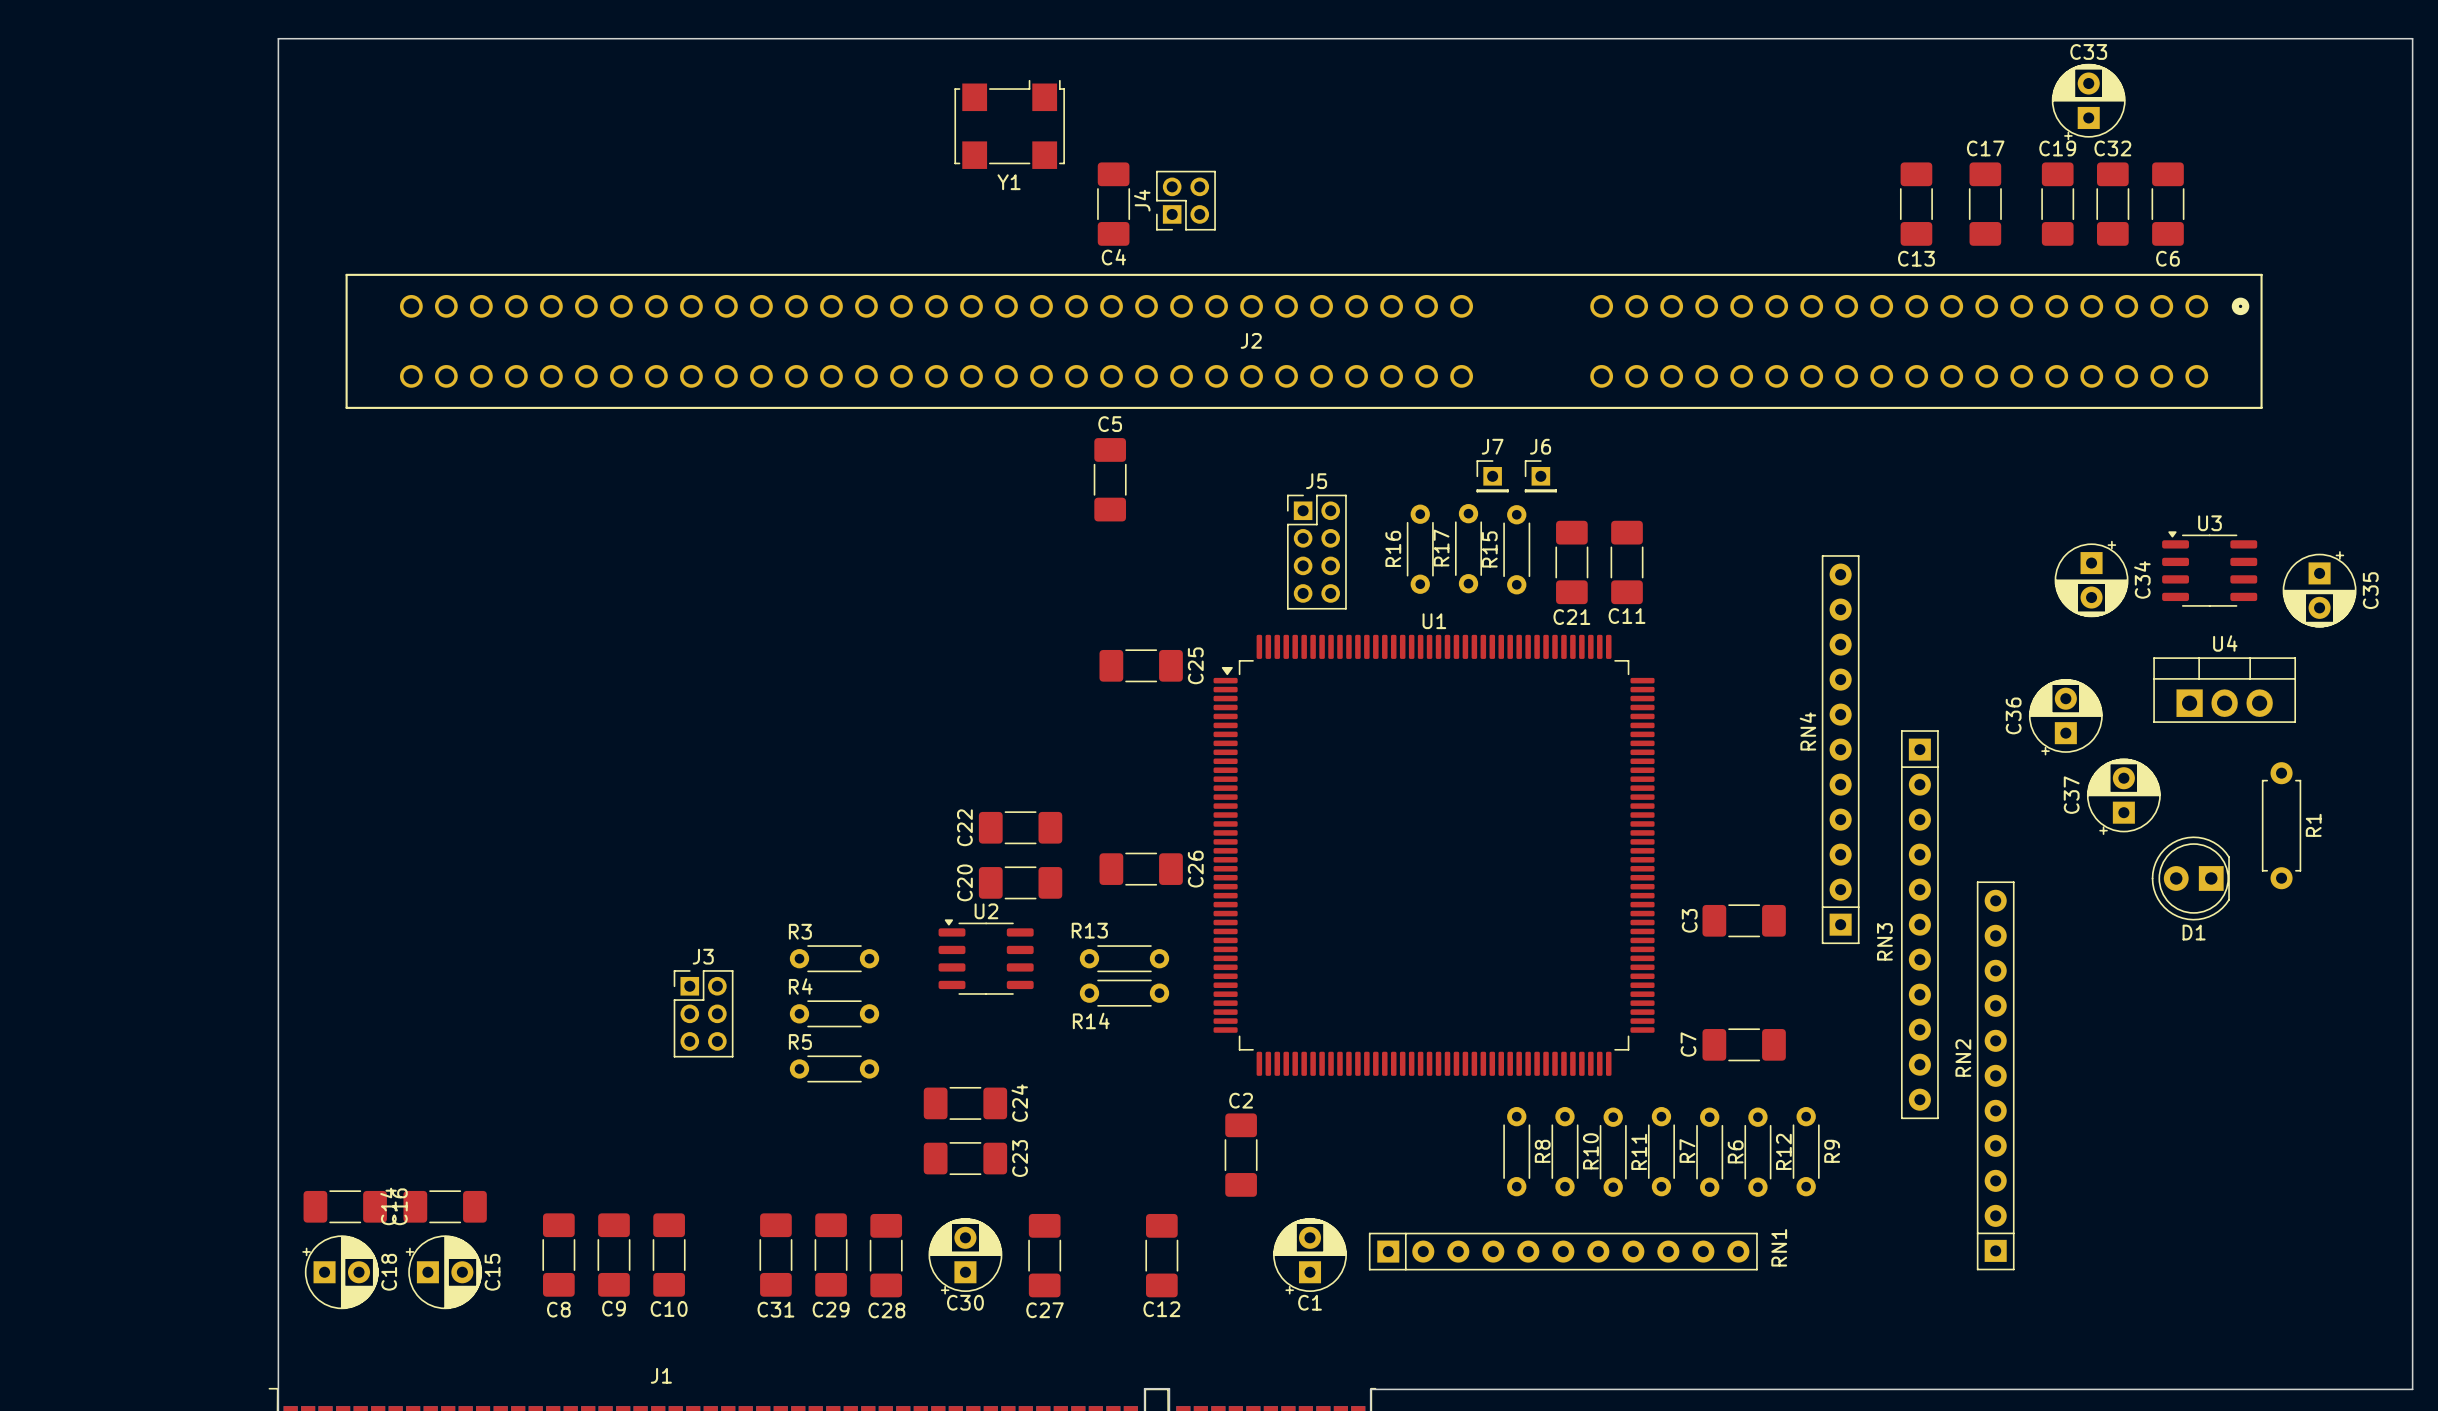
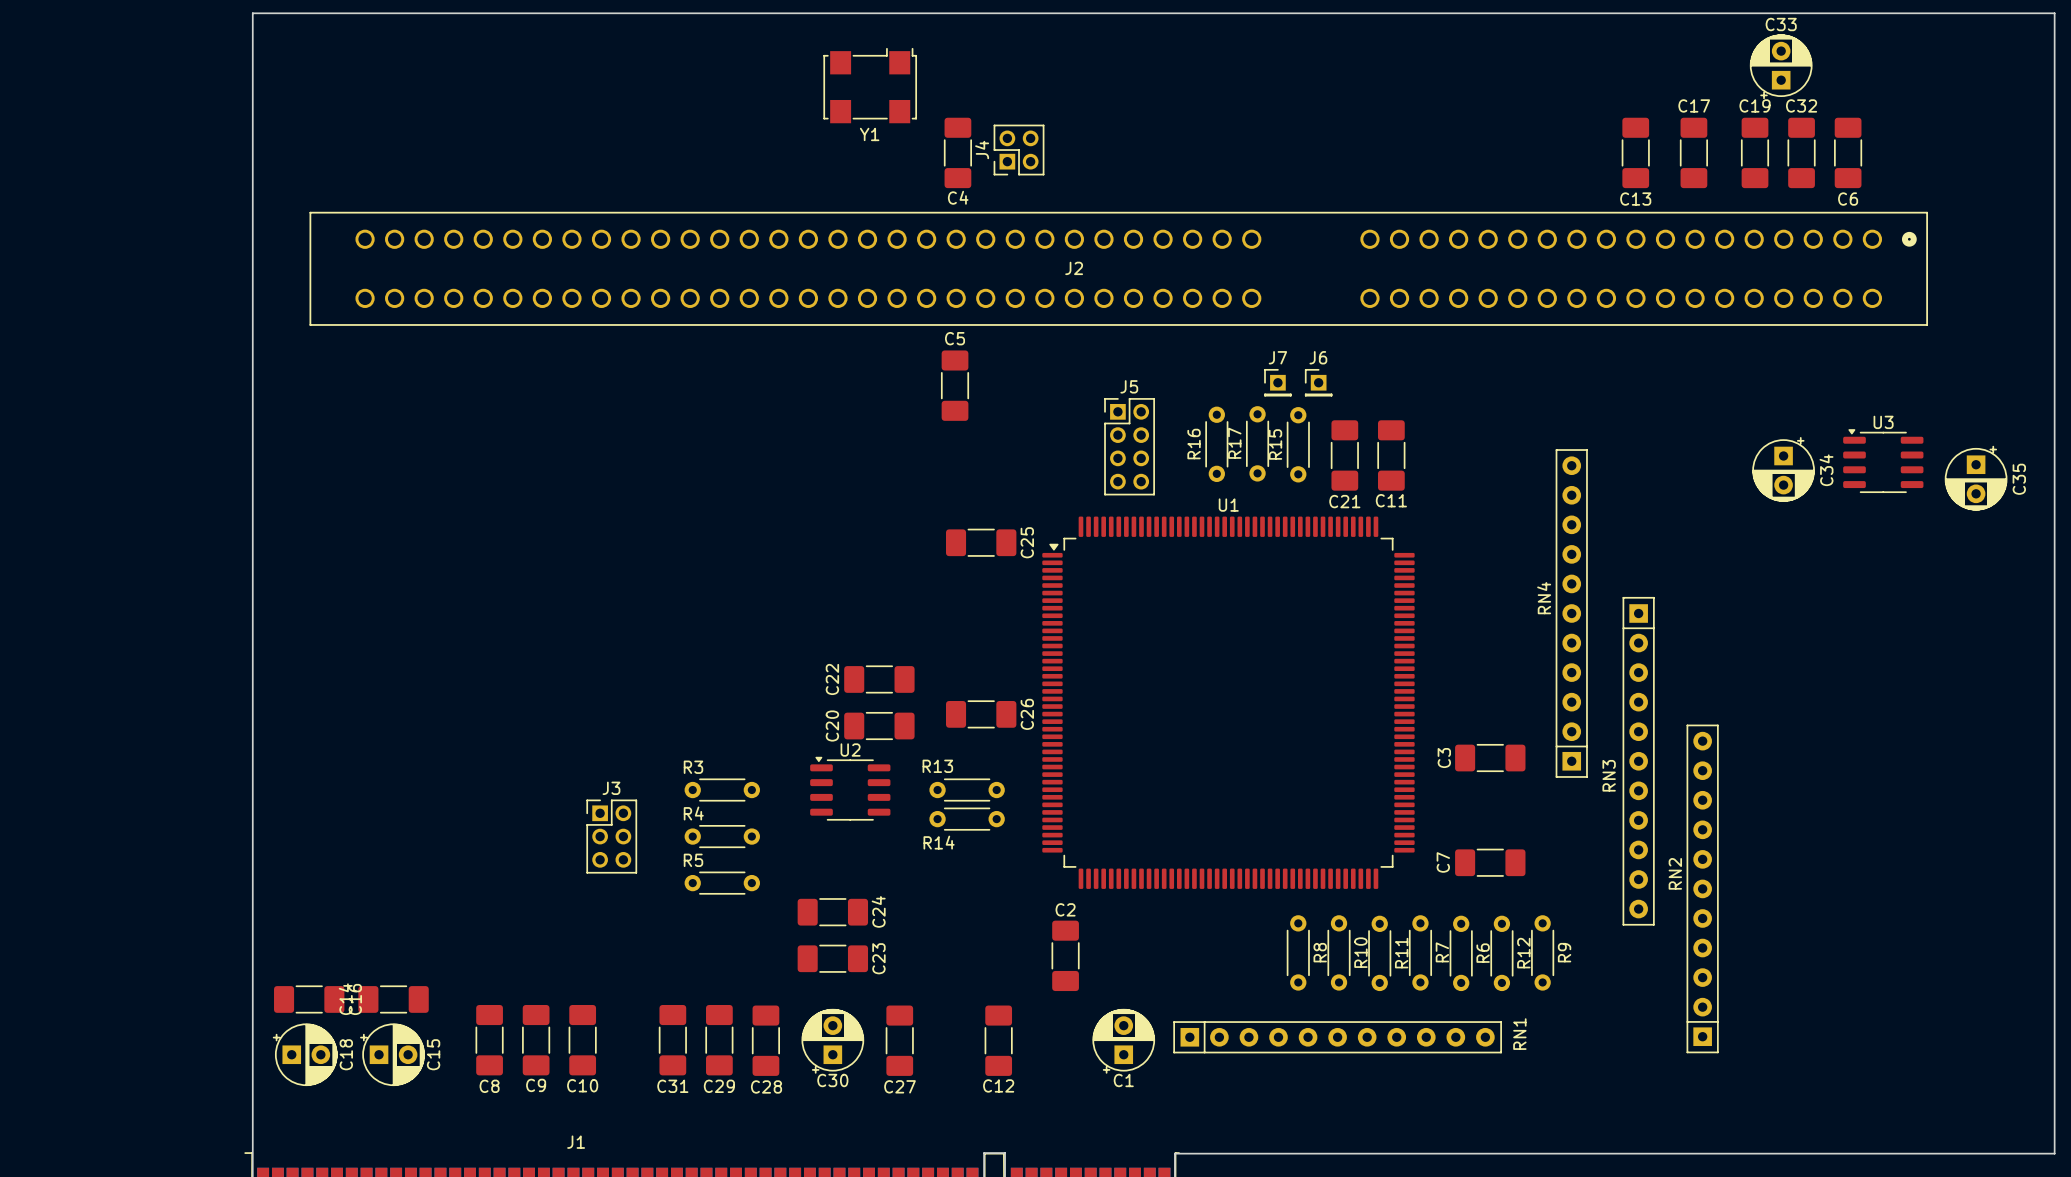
U4: (2224, 690) -> none
C36: (2065, 717) -> none
C37: (2123, 796) -> none
R1: (2281, 825) -> none
D1: (2190, 878) -> none

